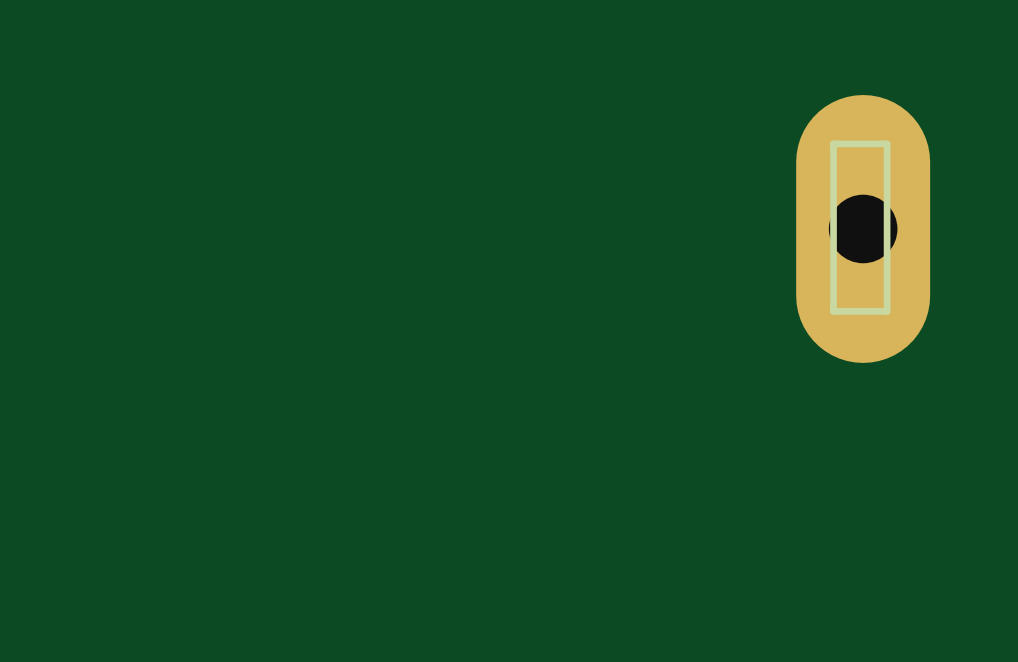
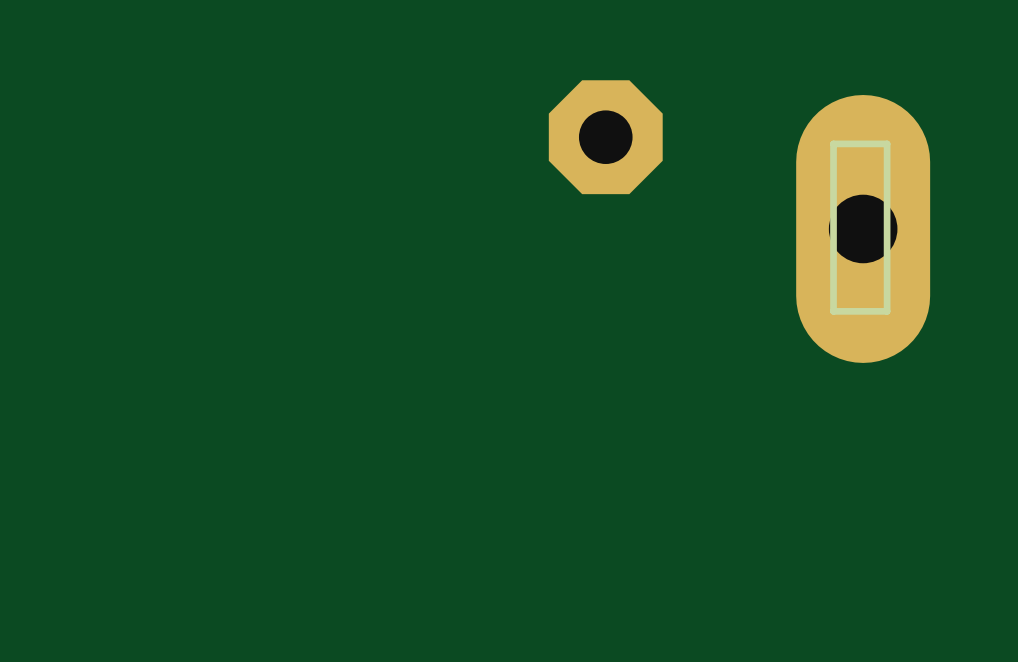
part: none -> (605, 137)

